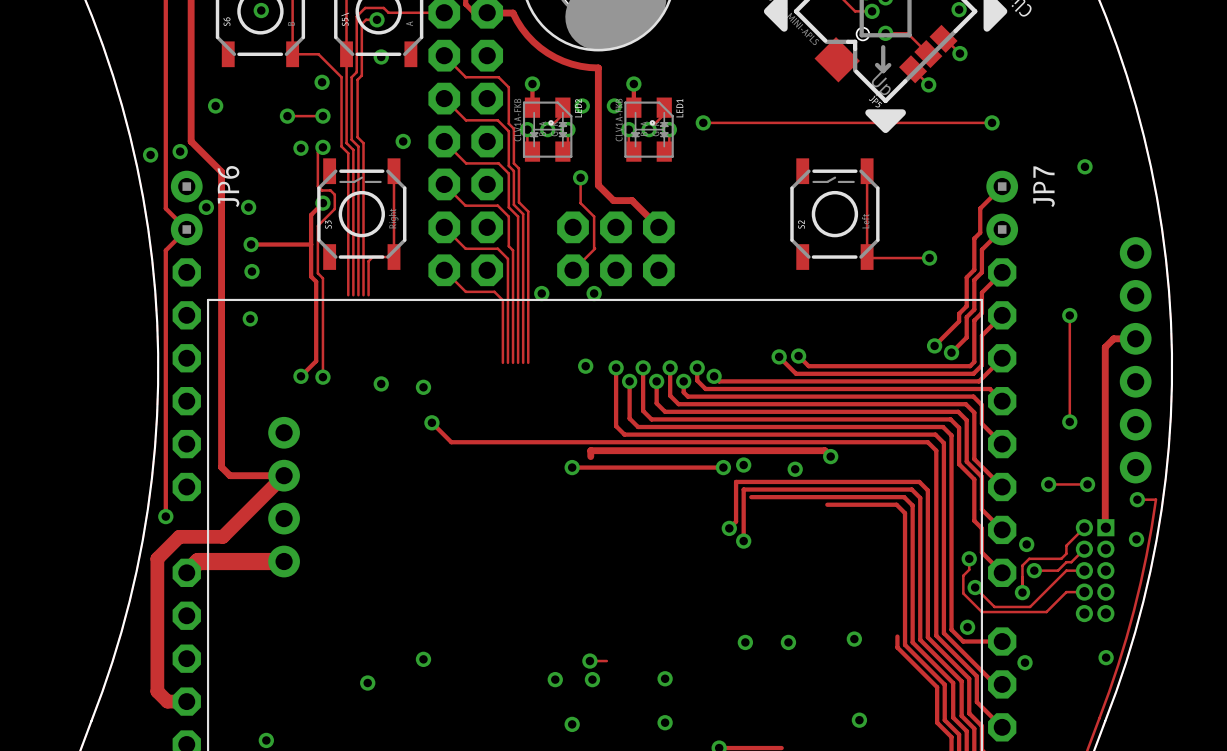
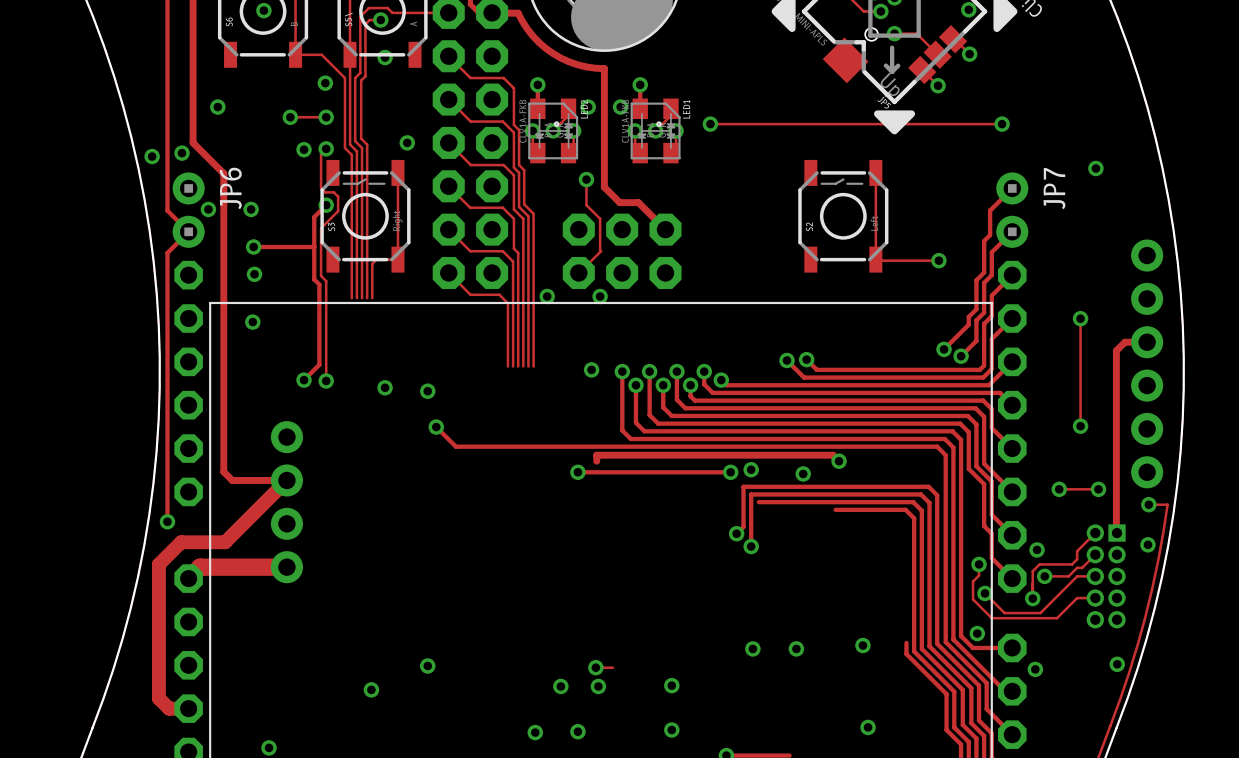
via: none -> (535, 732)

